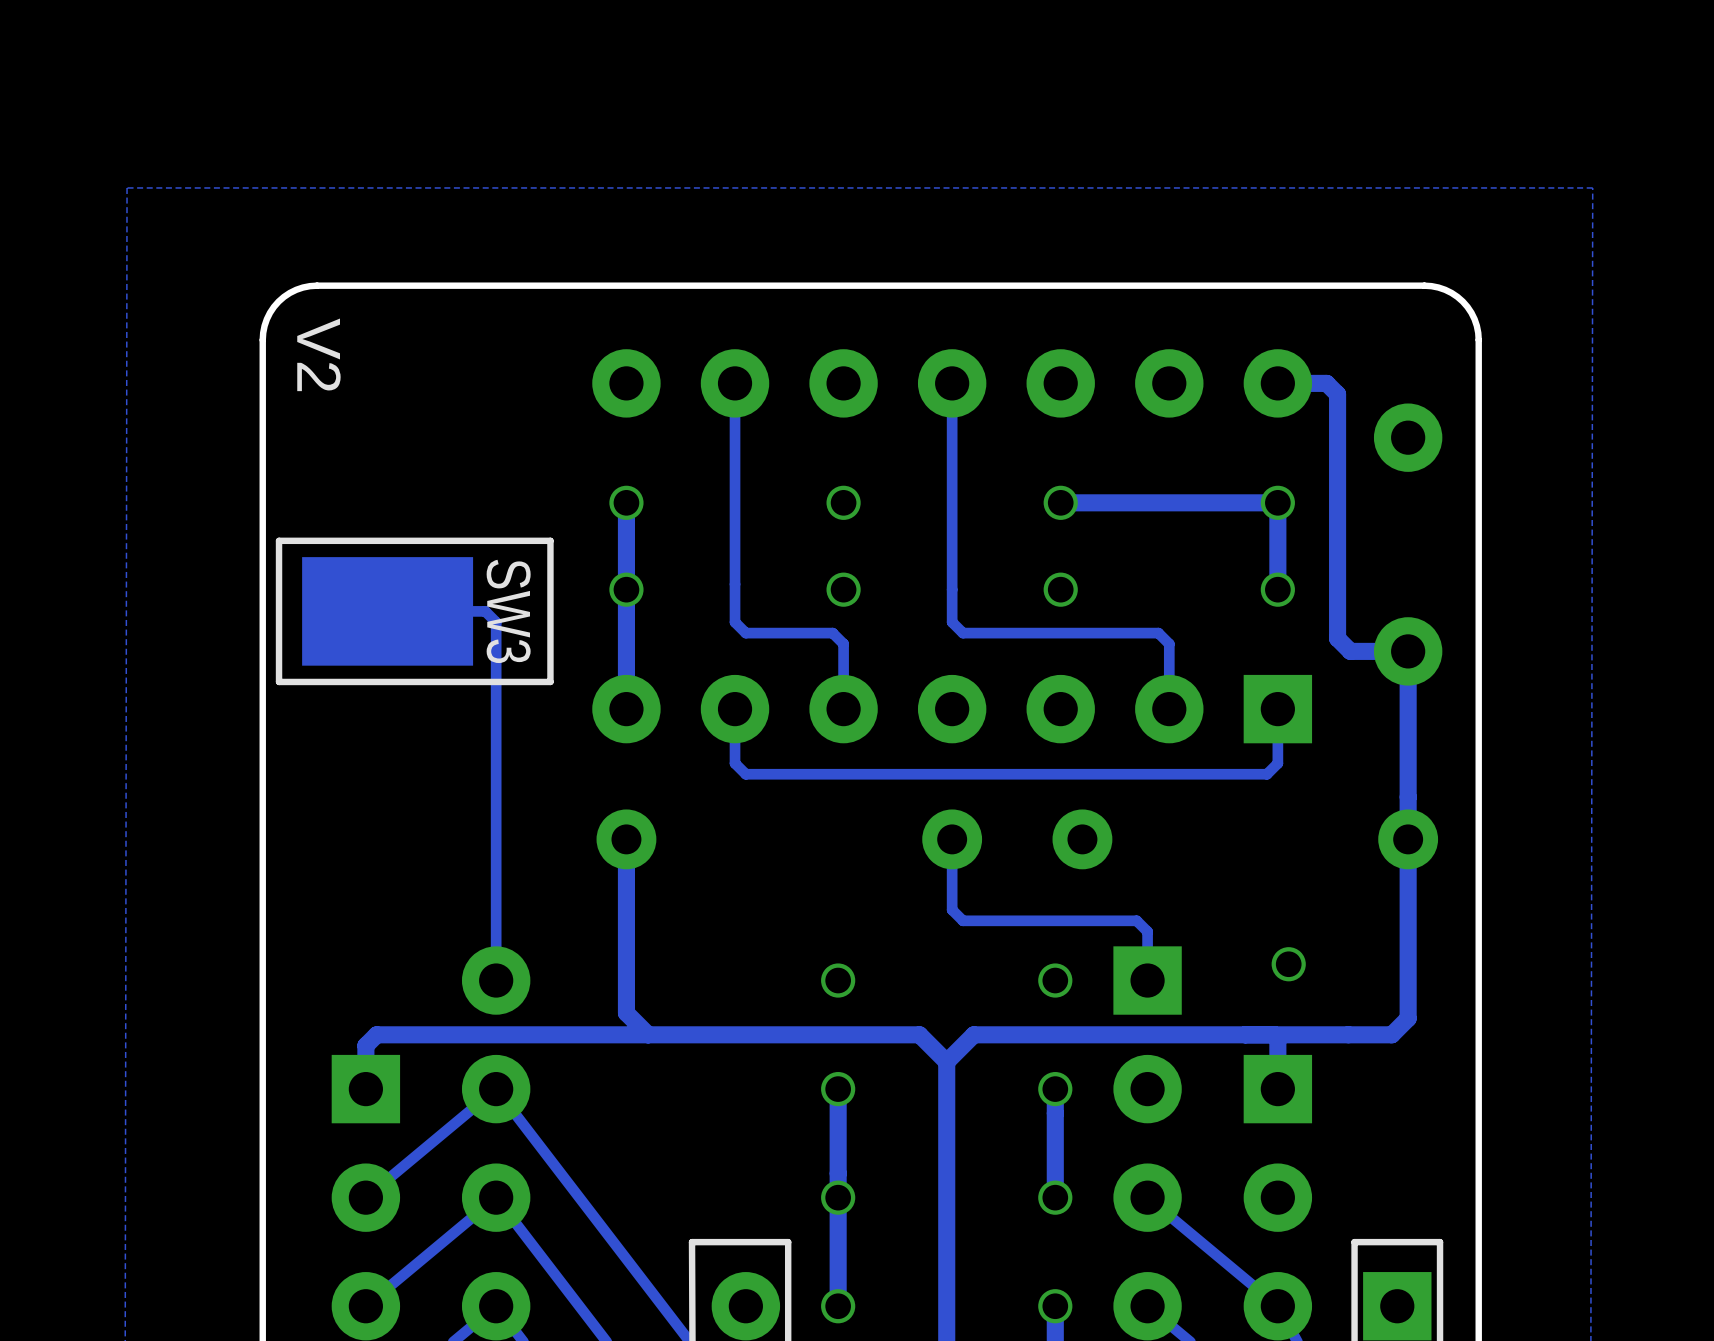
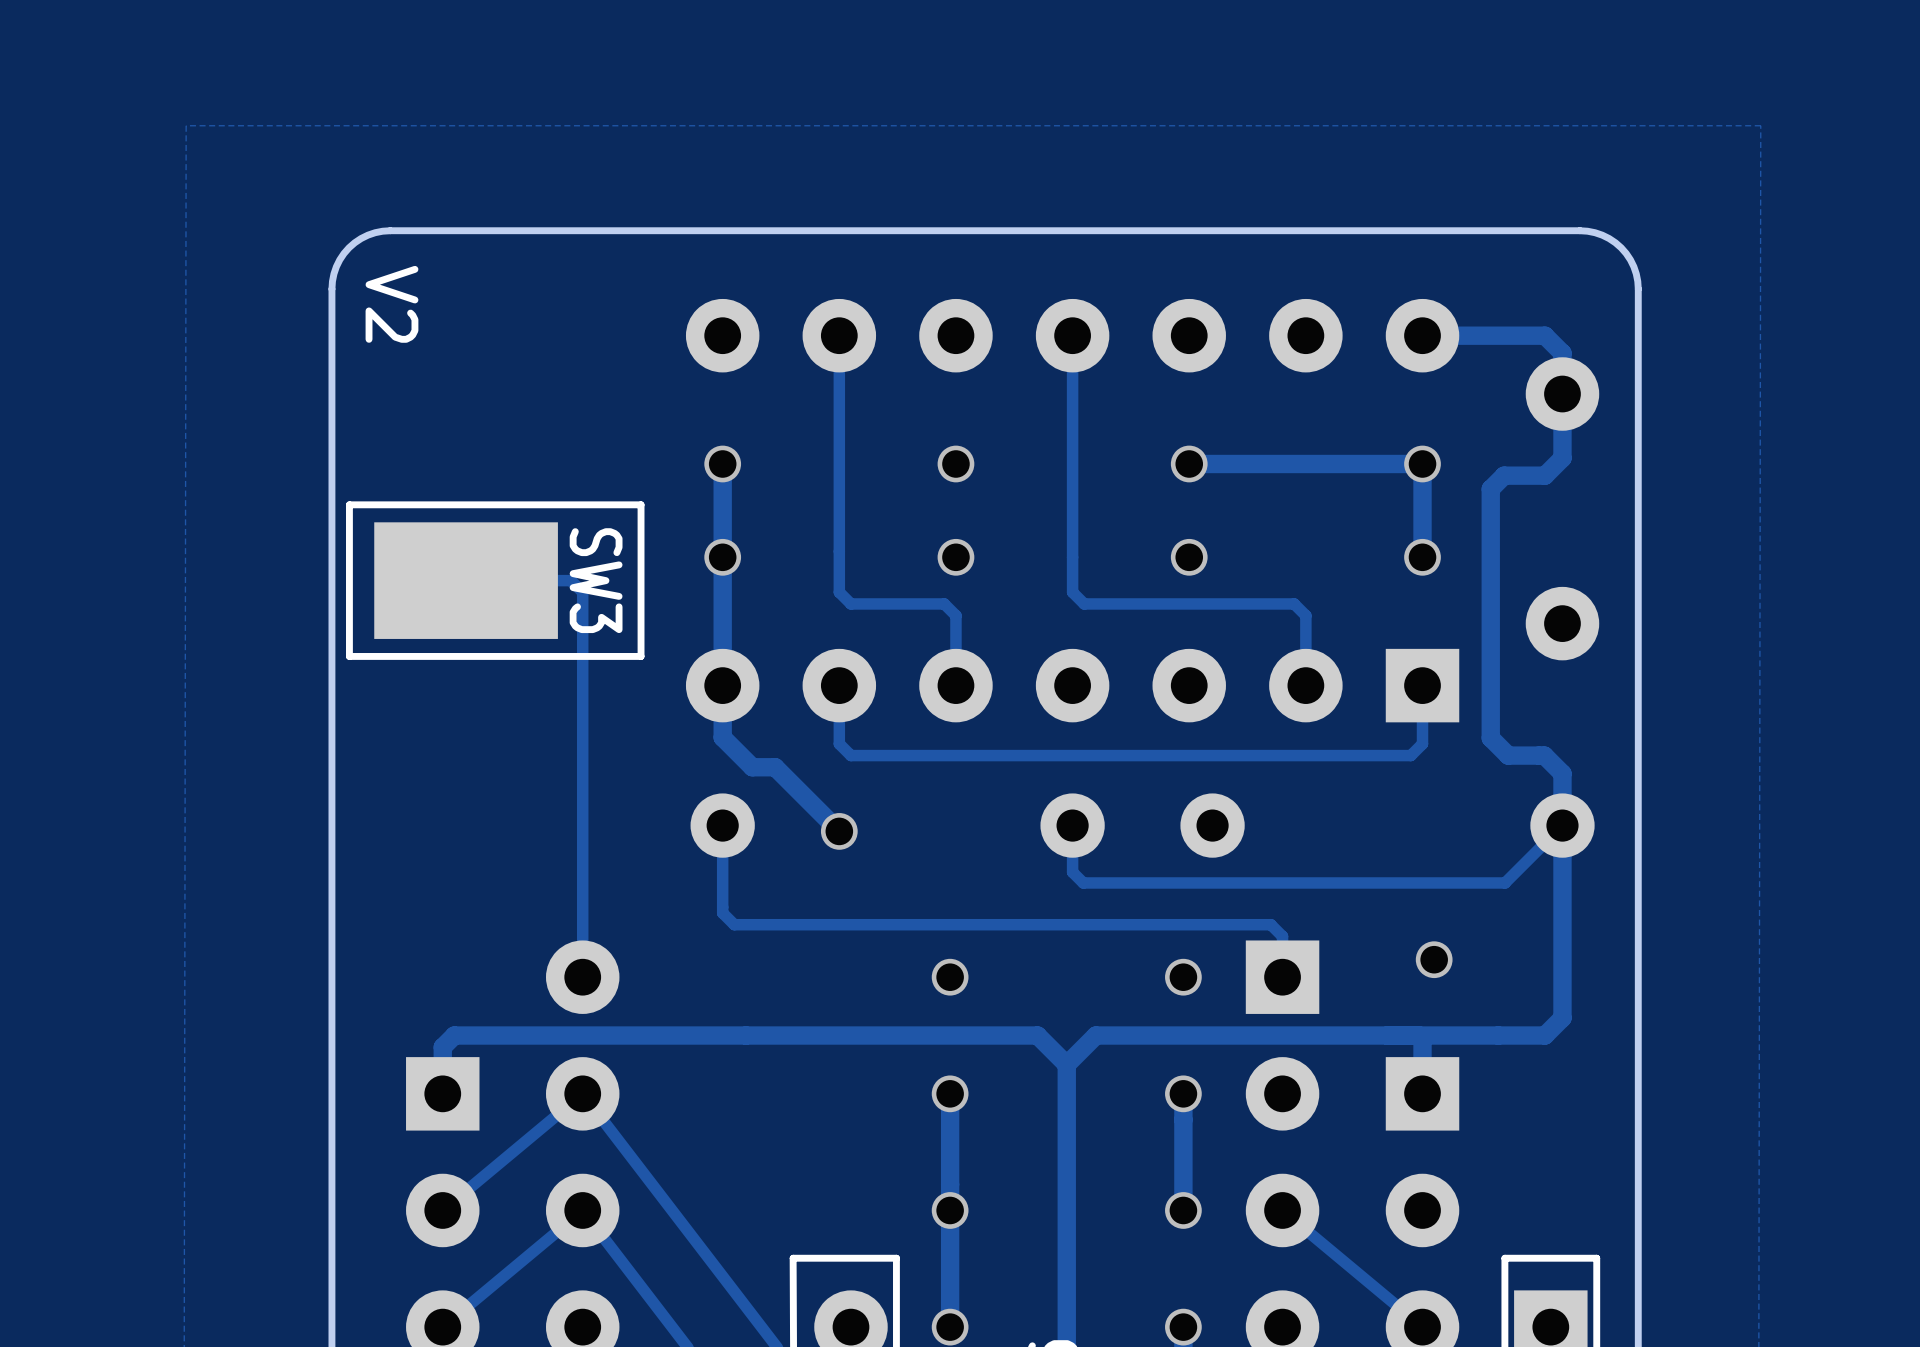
track: (1326, 383) (1337, 394) (1337, 638) (1350, 651) (1408, 651) (1408, 791) -> (1475, 335) (1544, 335) (1562, 353) (1562, 458) (1544, 475) (1504, 475) (1490, 489) (1490, 738) (1508, 755) (1544, 755) (1562, 773)
track: none -> (722, 685) (722, 737) (752, 767) (775, 767) (839, 831)
track width: thick (626, 839) (626, 920) -> thin (722, 825) (722, 913)
via: none -> (839, 831)
track: (952, 882) (952, 909) (963, 920) (1136, 920) (1147, 931) (1147, 942) -> (1072, 872) (1083, 882) (1505, 882) (1562, 825)
track: (626, 920) (626, 1013) (648, 1034) -> (722, 913) (734, 924) (1270, 924) (1282, 936)

